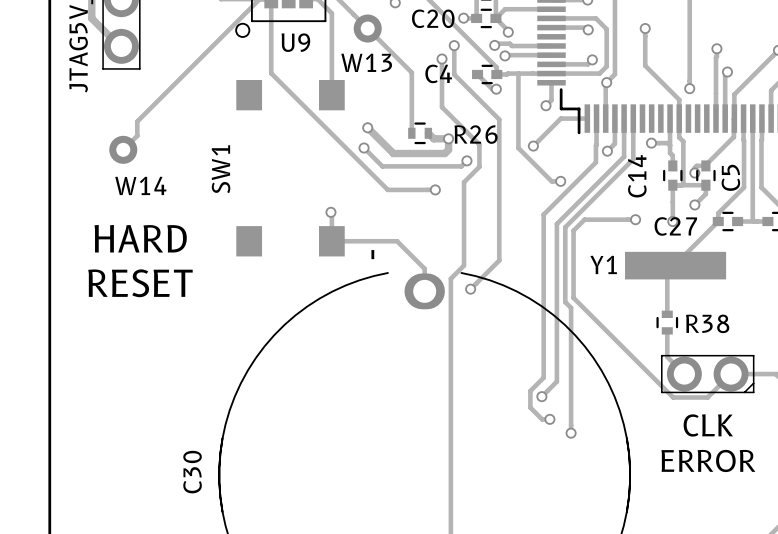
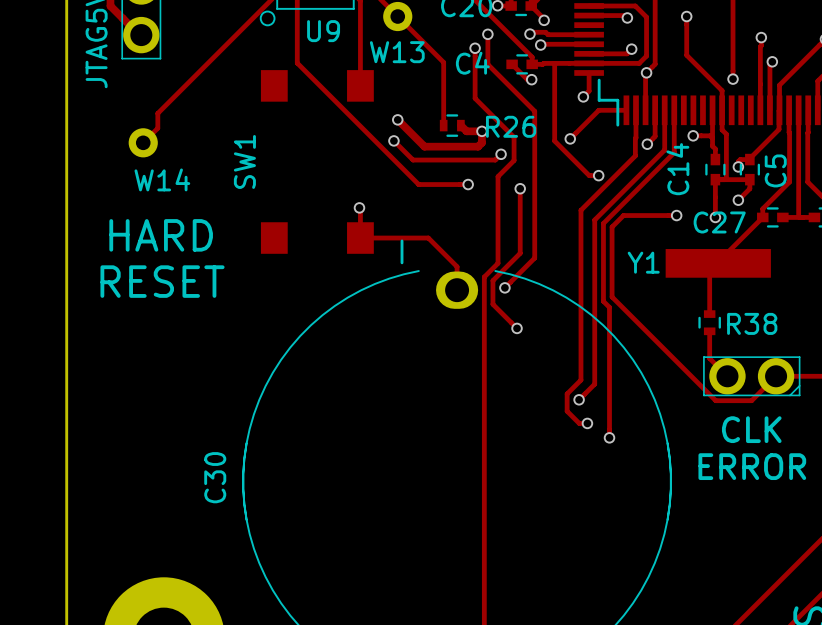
track: none -> (520, 188) (520, 253) (492, 280) (492, 304) (517, 328)
via: none -> (520, 188)
via: none -> (517, 328)

